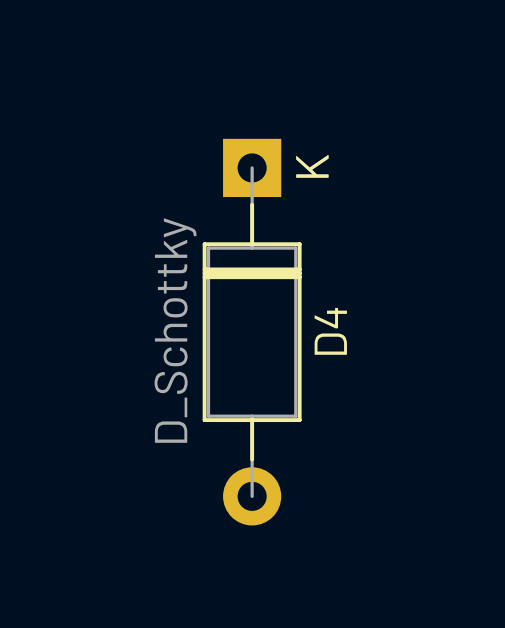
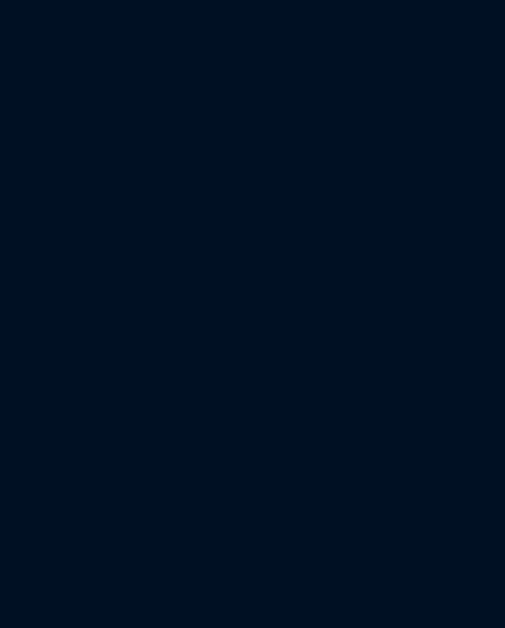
D4: D_Schottky (252, 332) -> none

